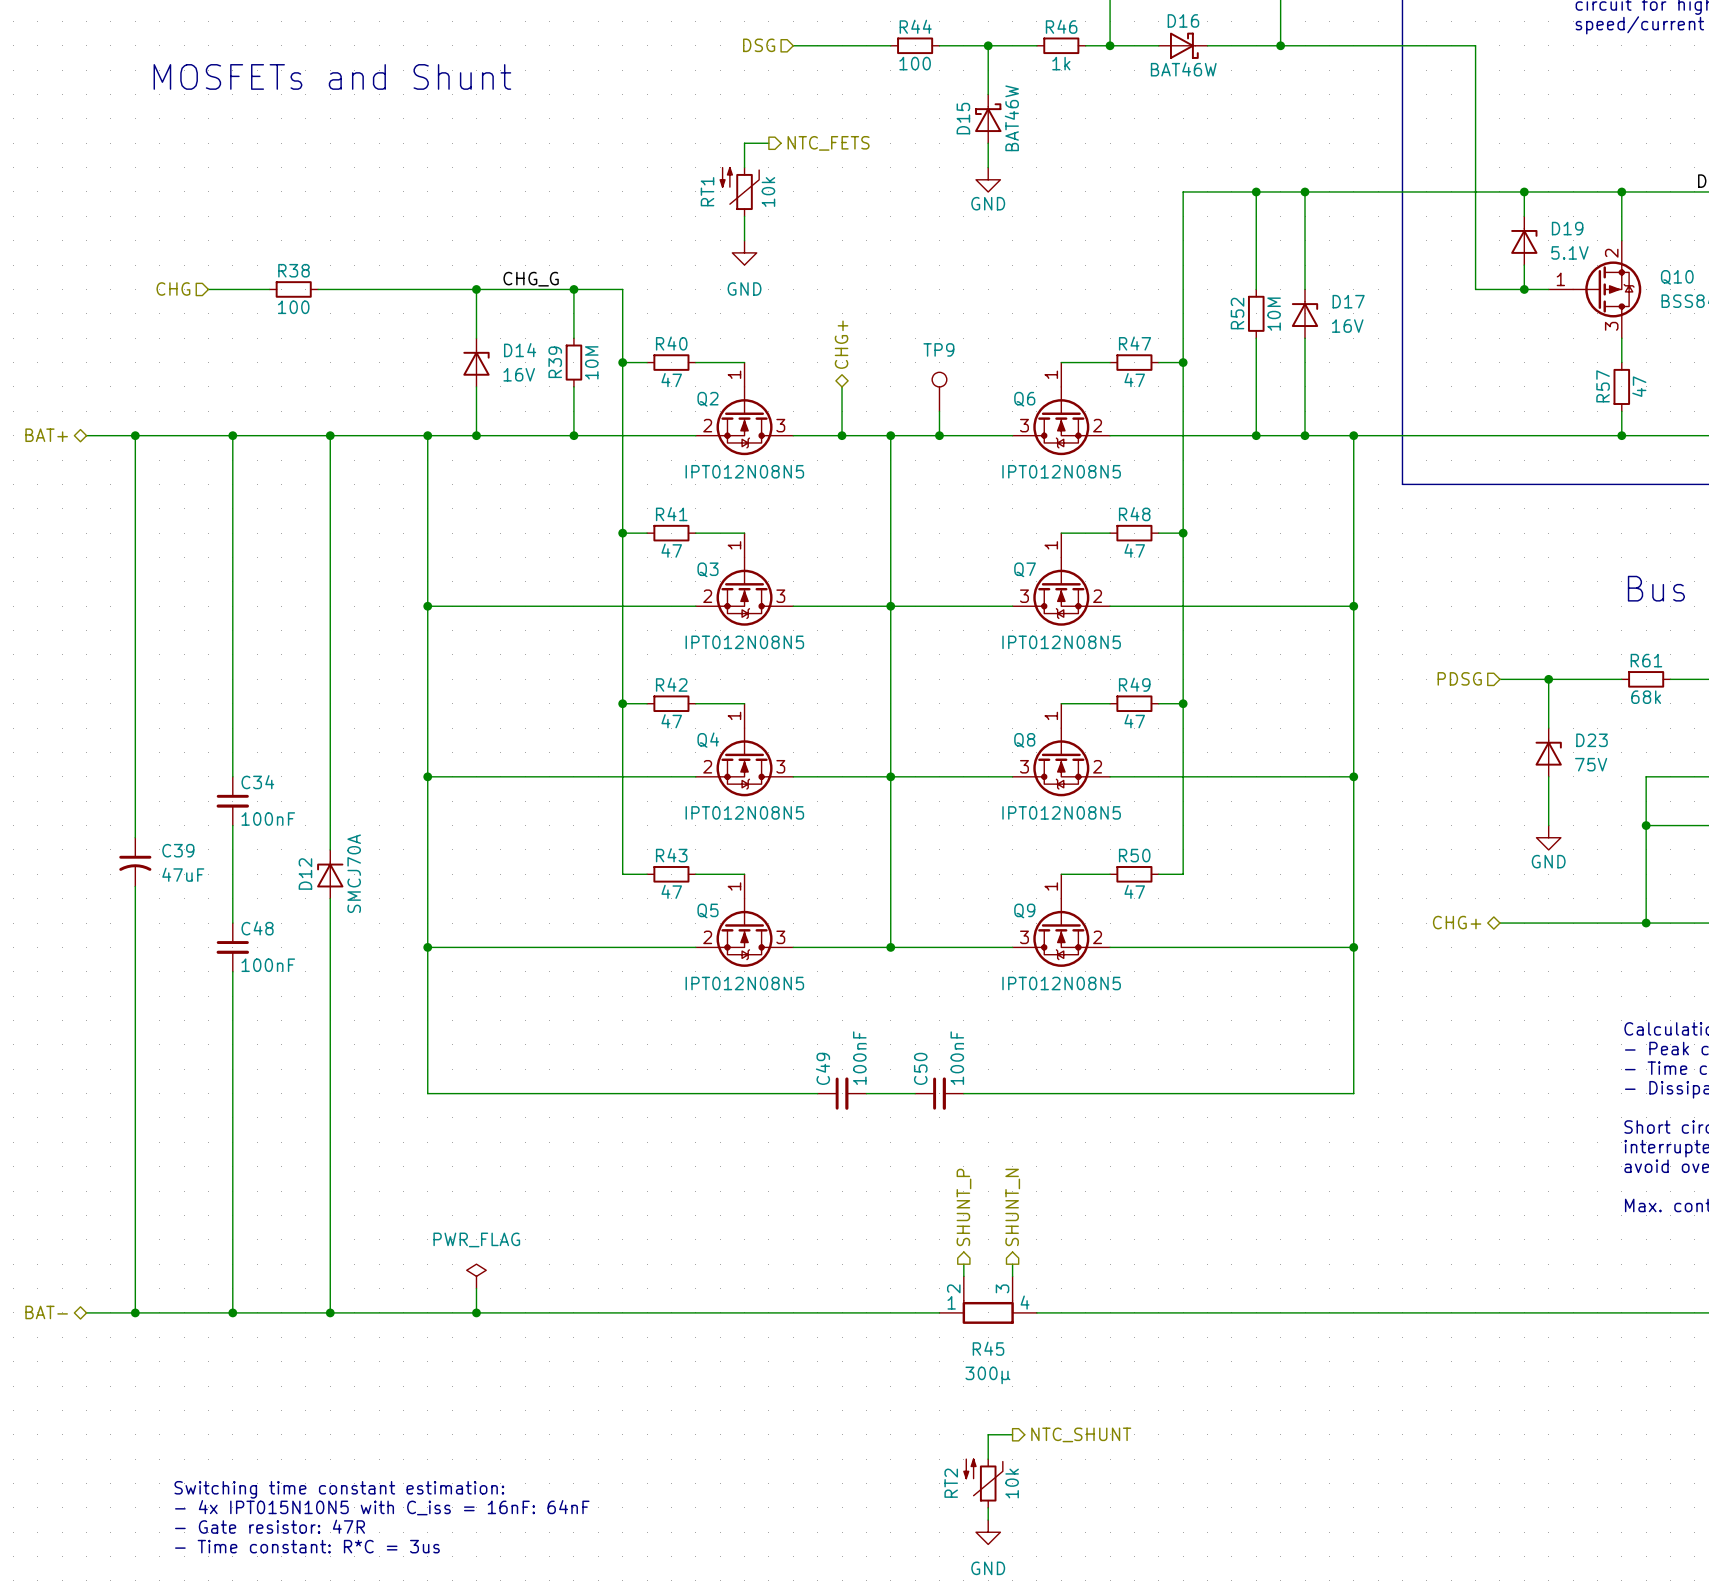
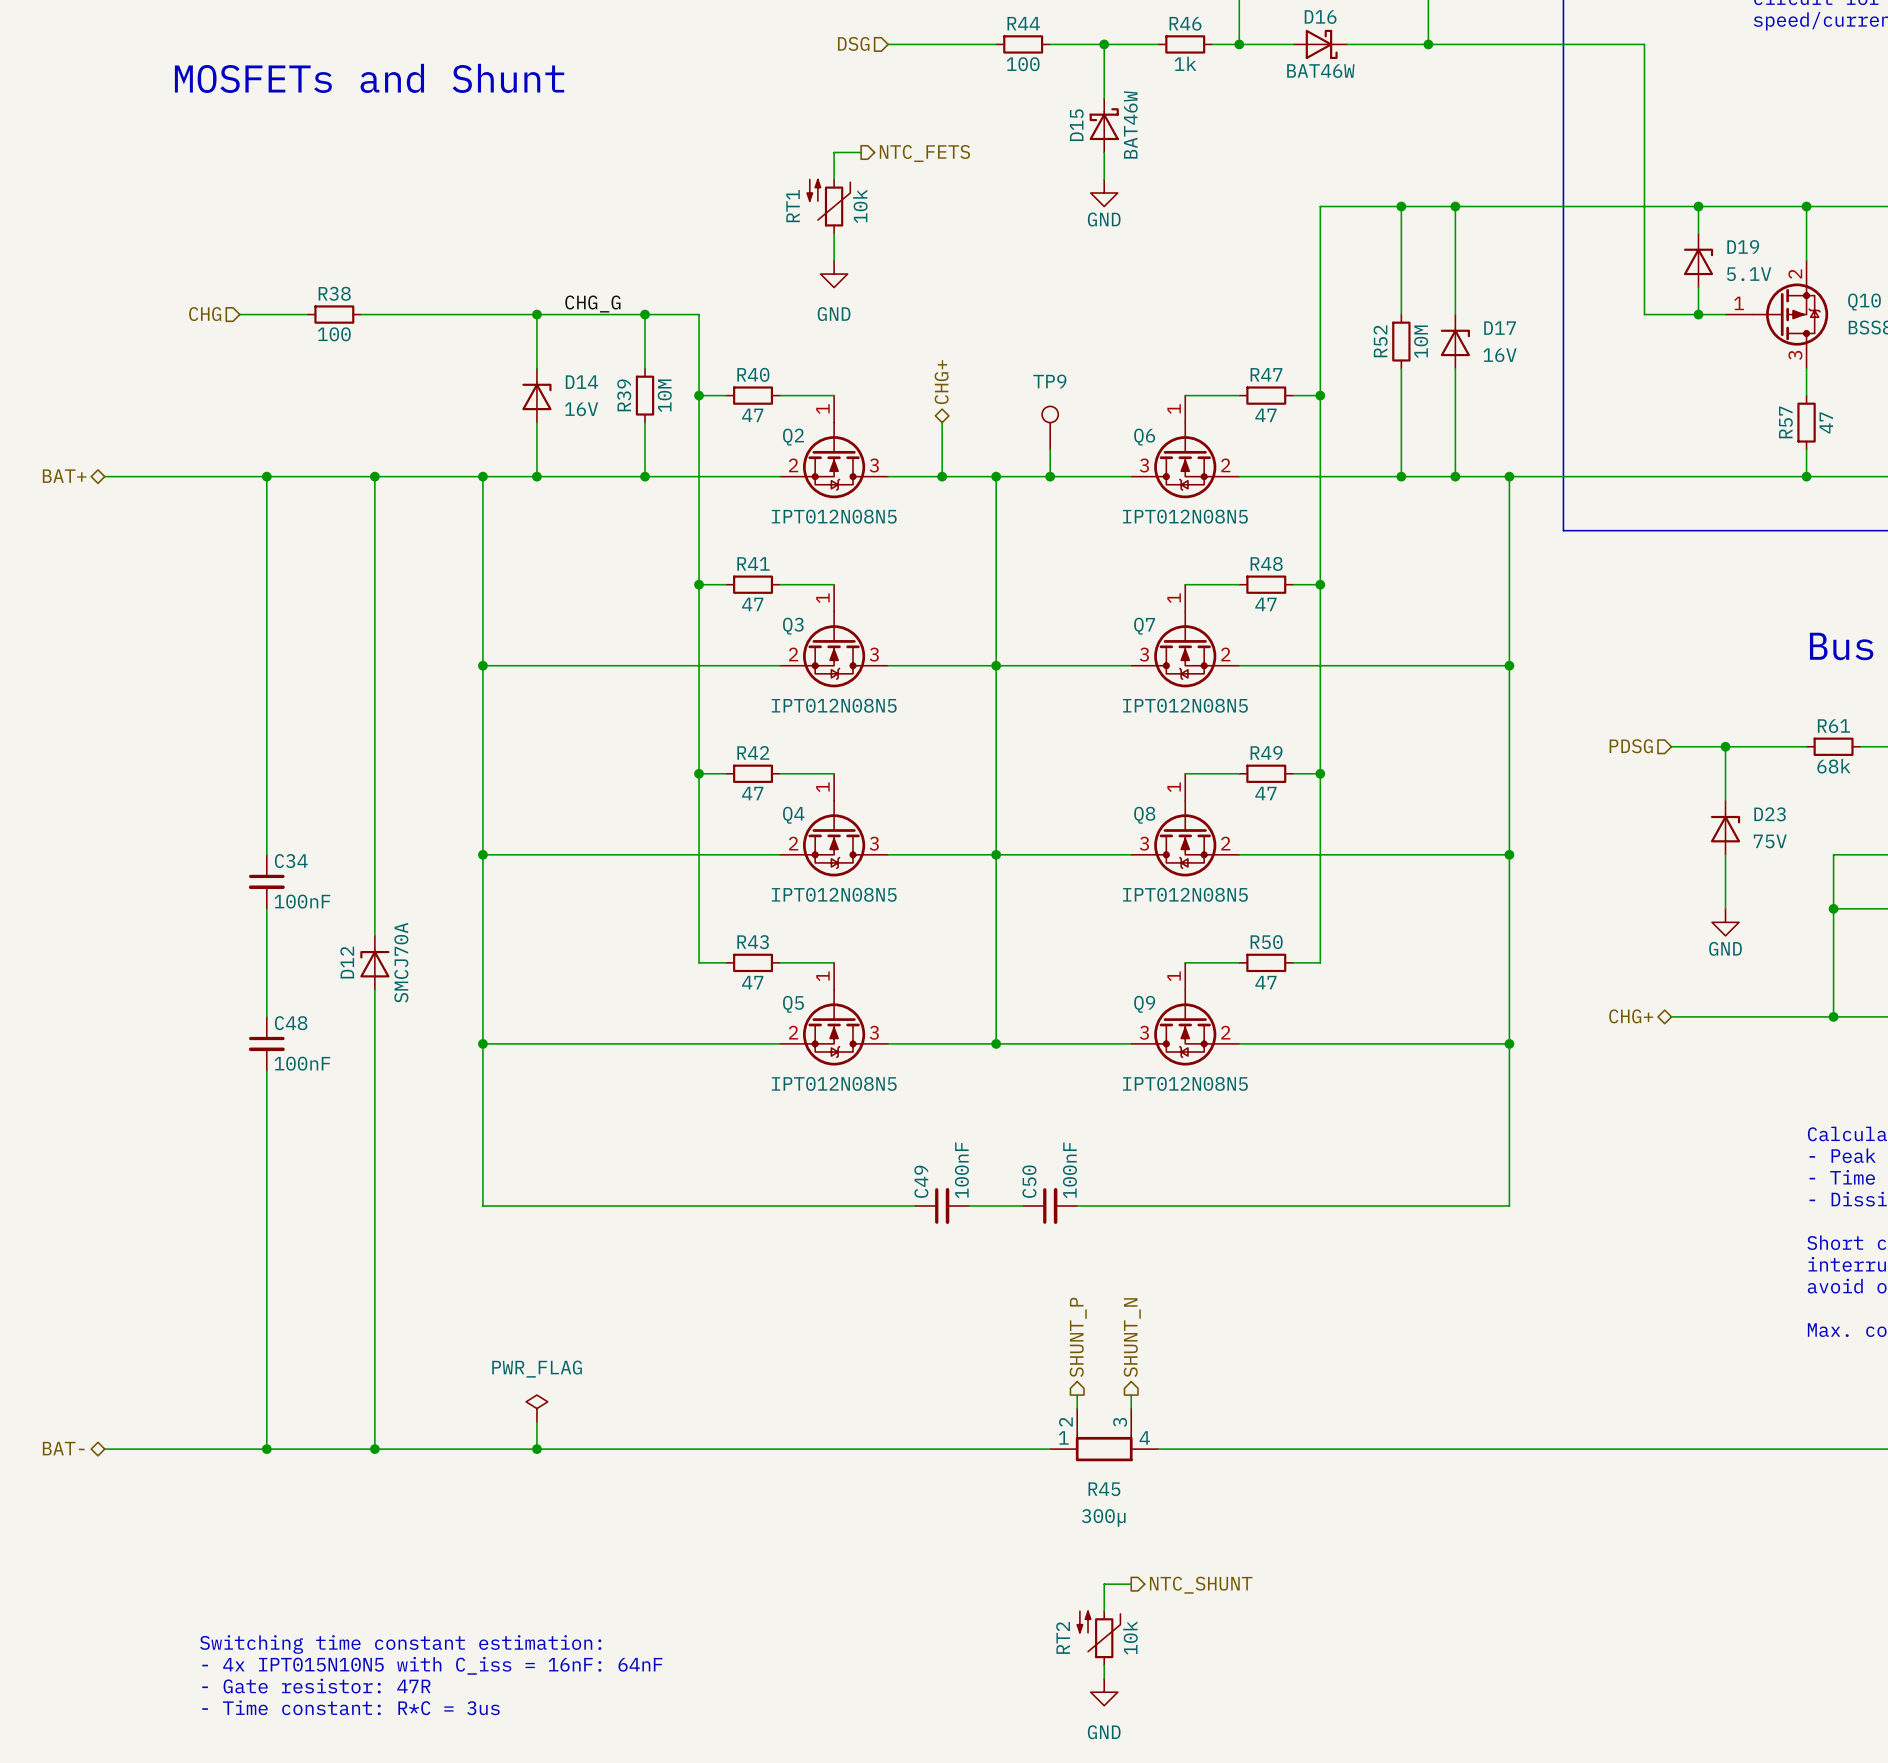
wire: (135, 435) (135, 837) -> none
junction: (135, 435) -> none
C39: 47uF (135, 862) -> none
wire: (135, 886) (135, 1312) -> none
junction: (135, 1312) -> none

